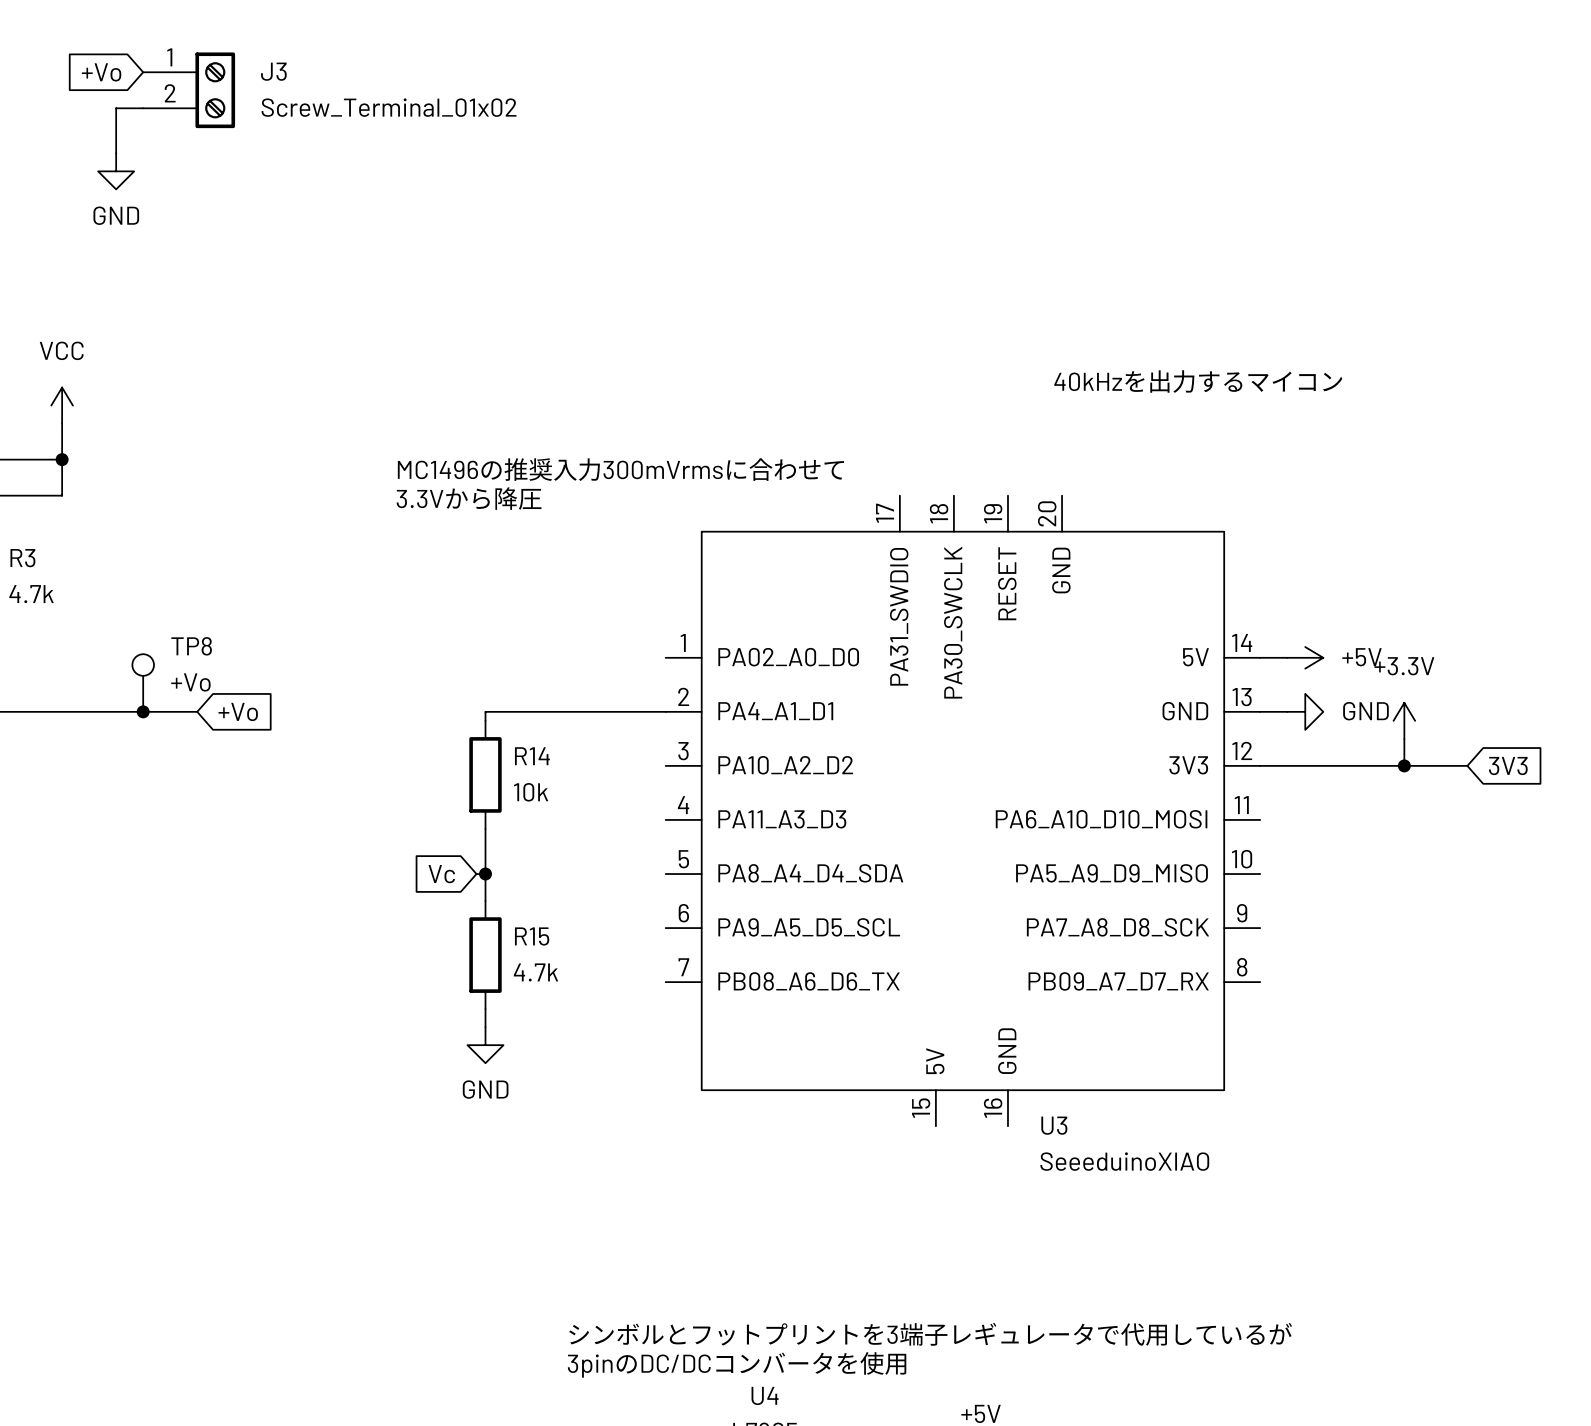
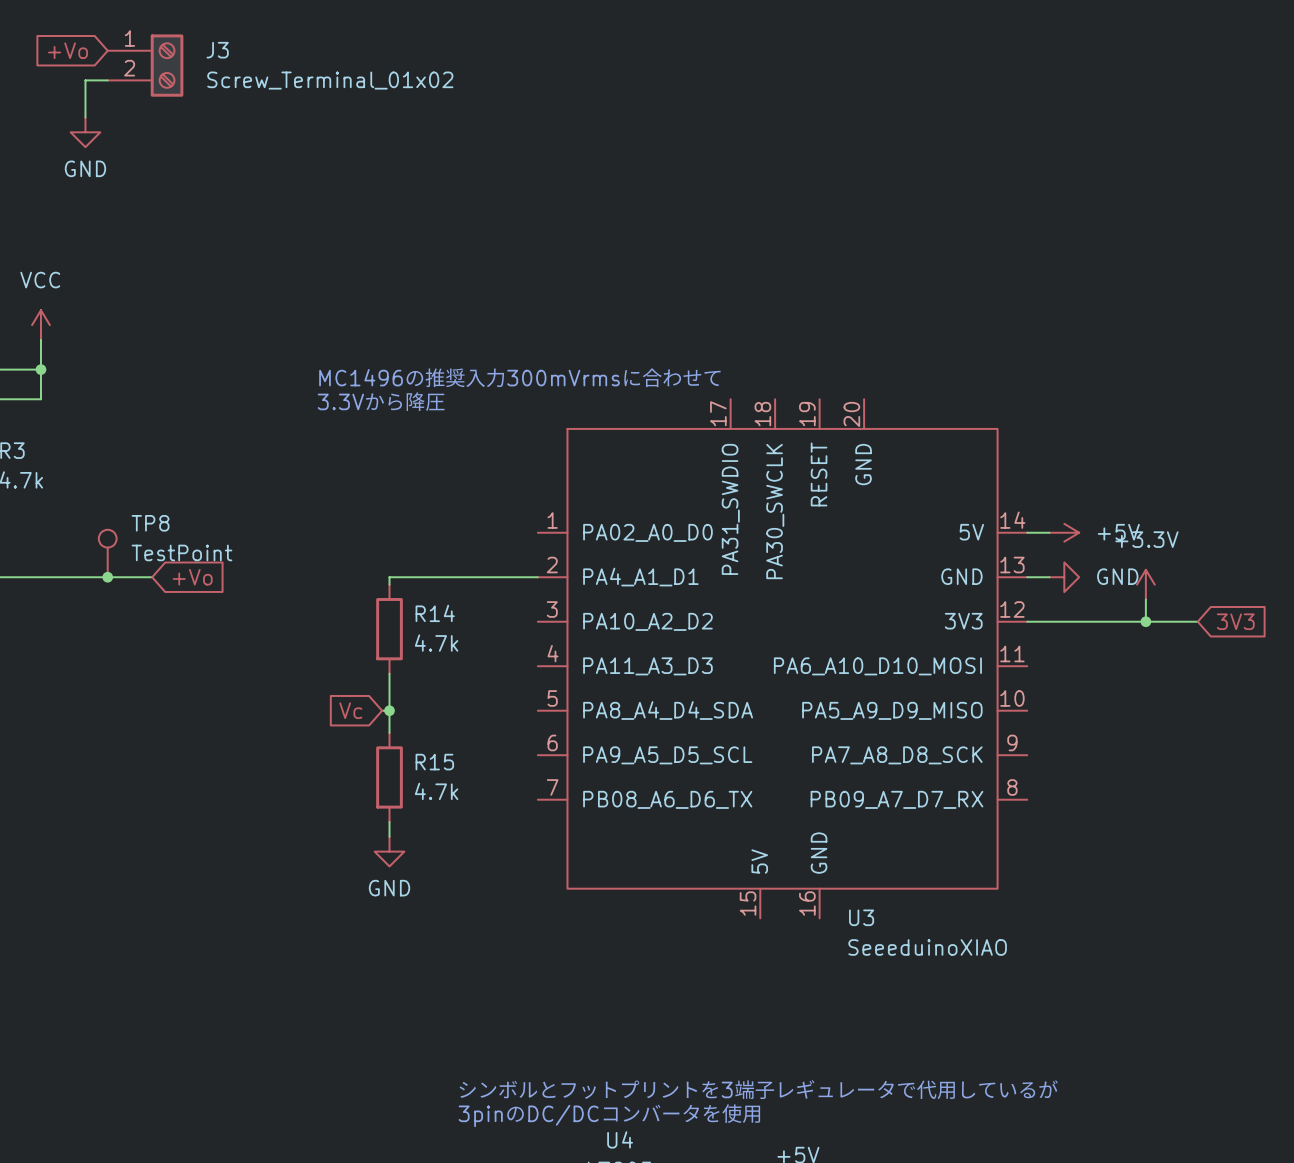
text: 40kHzを出力するマイコン (1198, 381) -> none
TP8 value: +Vo (190, 682) -> TestPoint (181, 552)
R14 value: 10k (531, 792) -> 4.7k (436, 643)

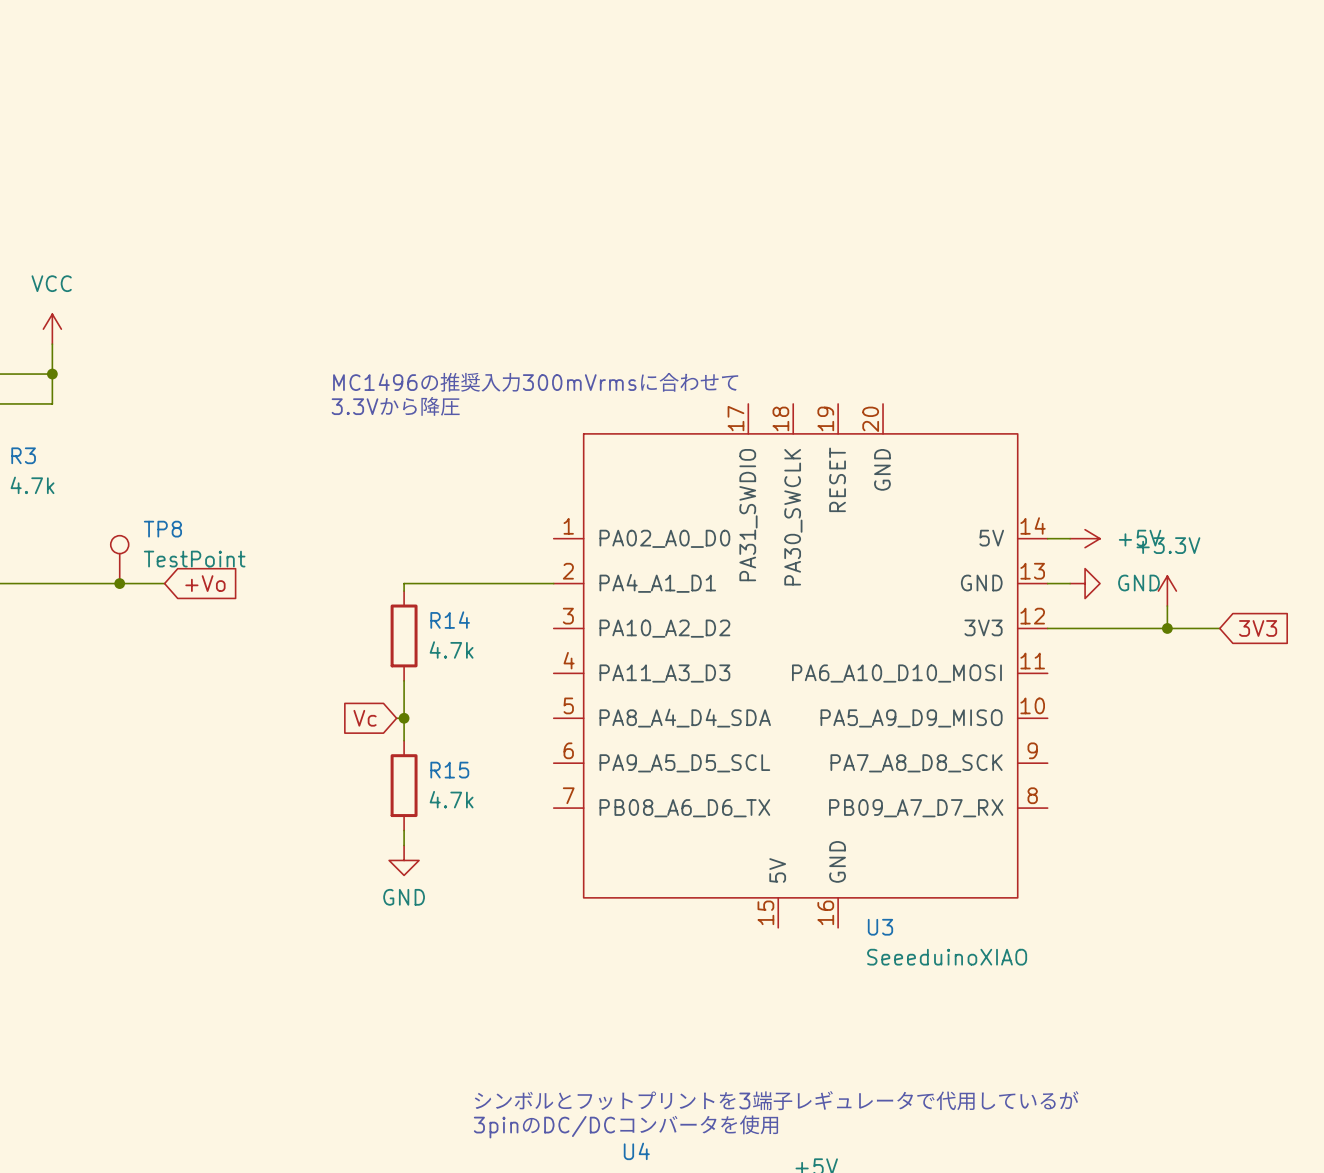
global label: +Vo (67, 50) -> none
J3: Screw_Terminal_01x02 (145, 65) -> none
wire: (107, 80) (85, 80) (85, 117) -> none
power symbol: GND (85, 132) -> none

